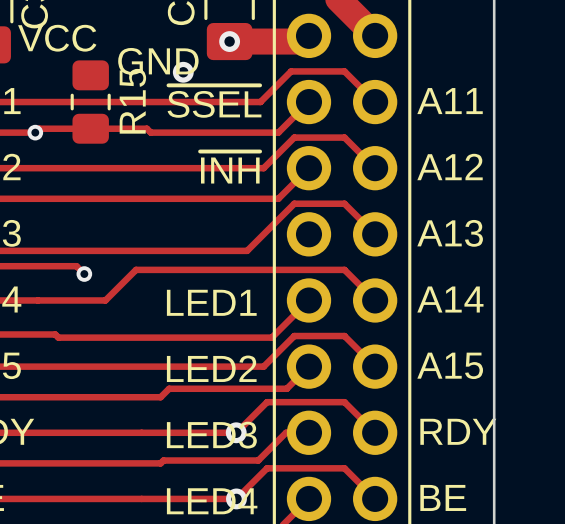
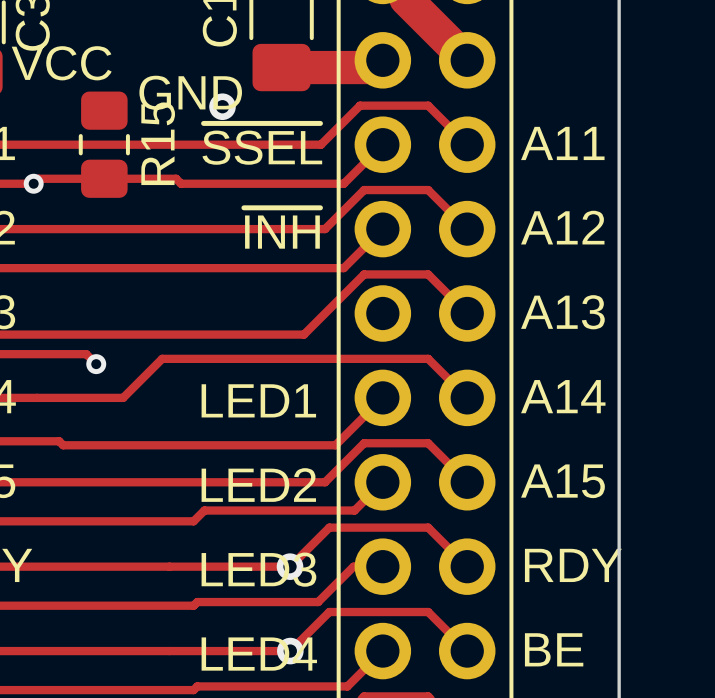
via: (229, 41) -> none

